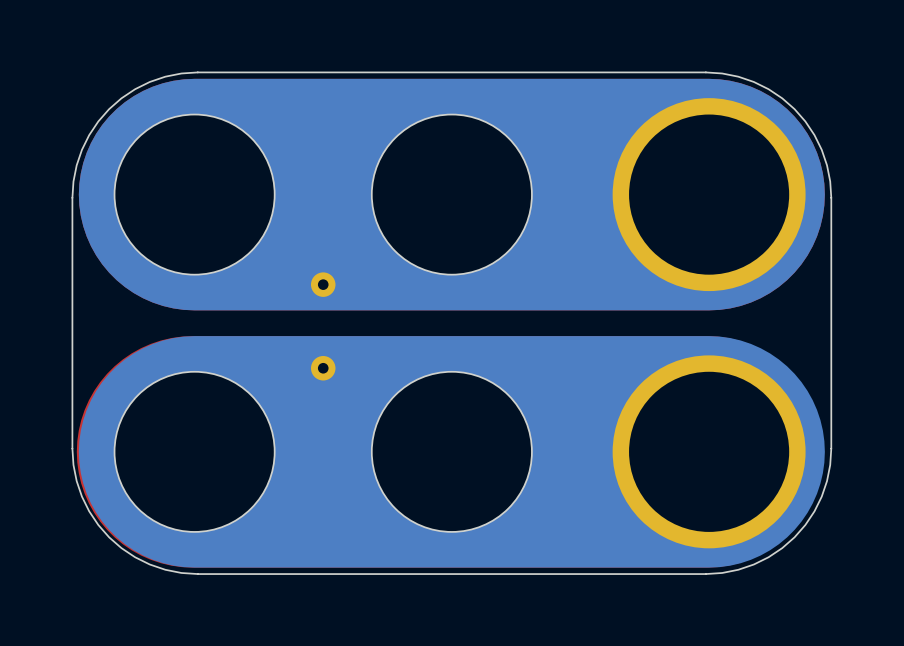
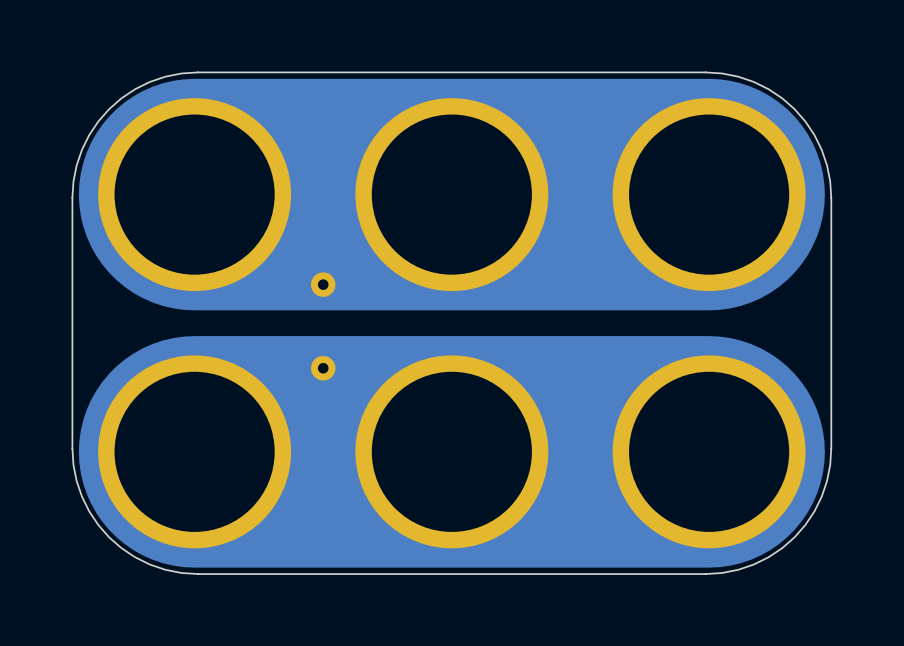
part footprint: [71, 71, 832, 575] -> [71, 71, 832, 575]

